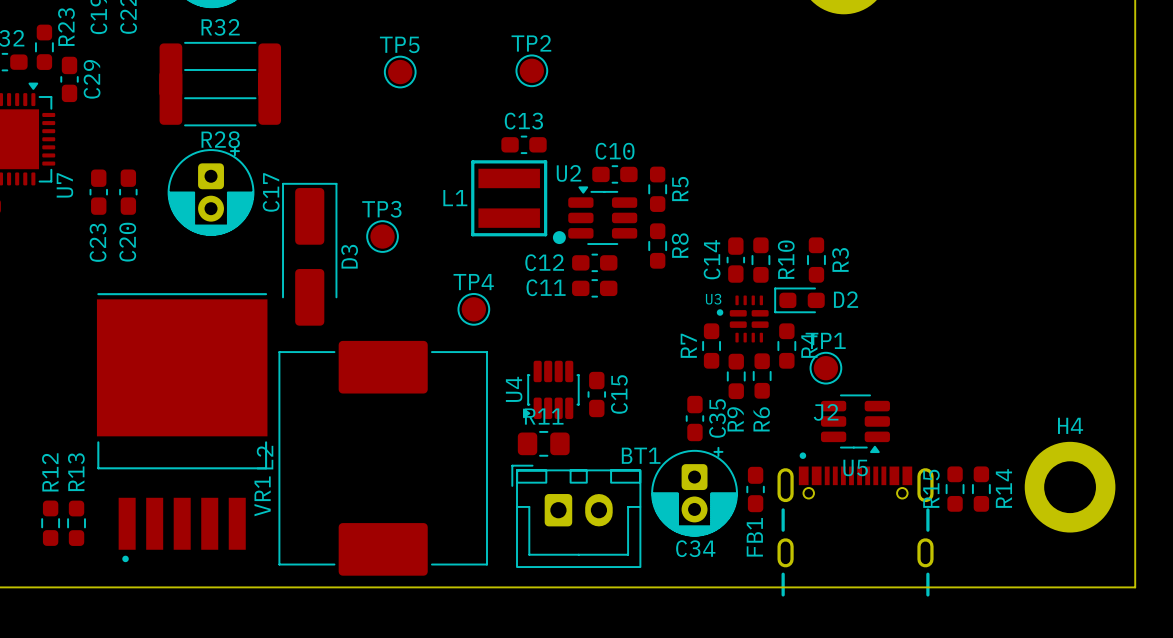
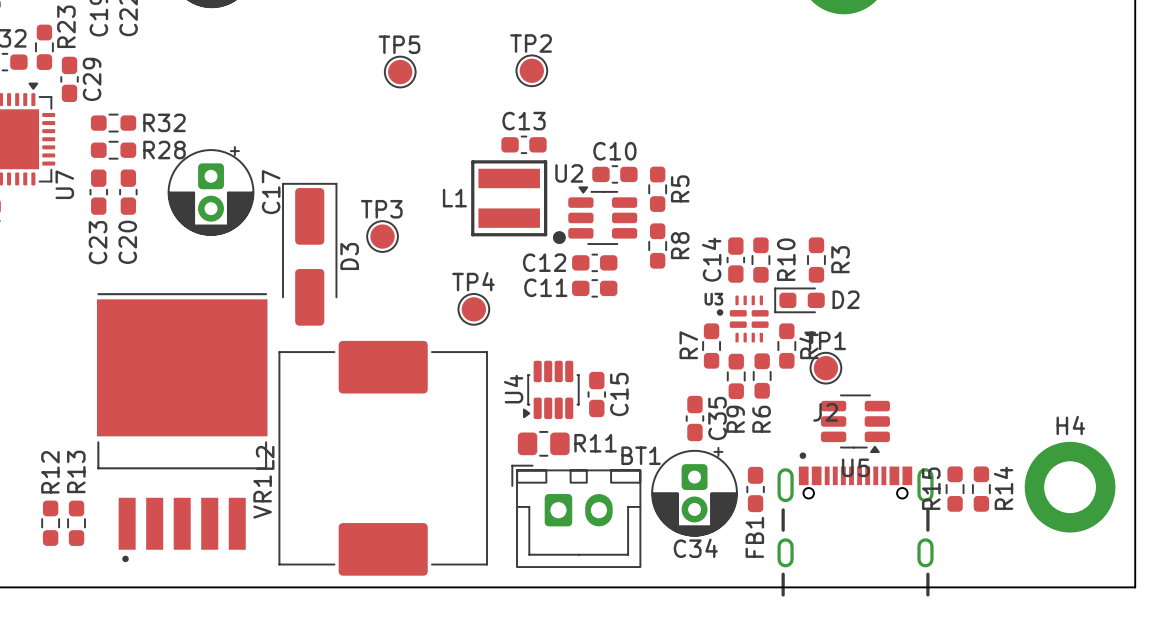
R32 name position: R32 (220, 27) -> R32 (164, 122)
R32 footprint: [159, 41, 282, 100] -> [90, 113, 137, 133]
R28 footprint: [159, 69, 282, 127] -> [90, 140, 137, 160]
R28 name position: R28 (220, 139) -> R28 (164, 150)
R11 name position: R11 (544, 416) -> R11 (595, 443)

